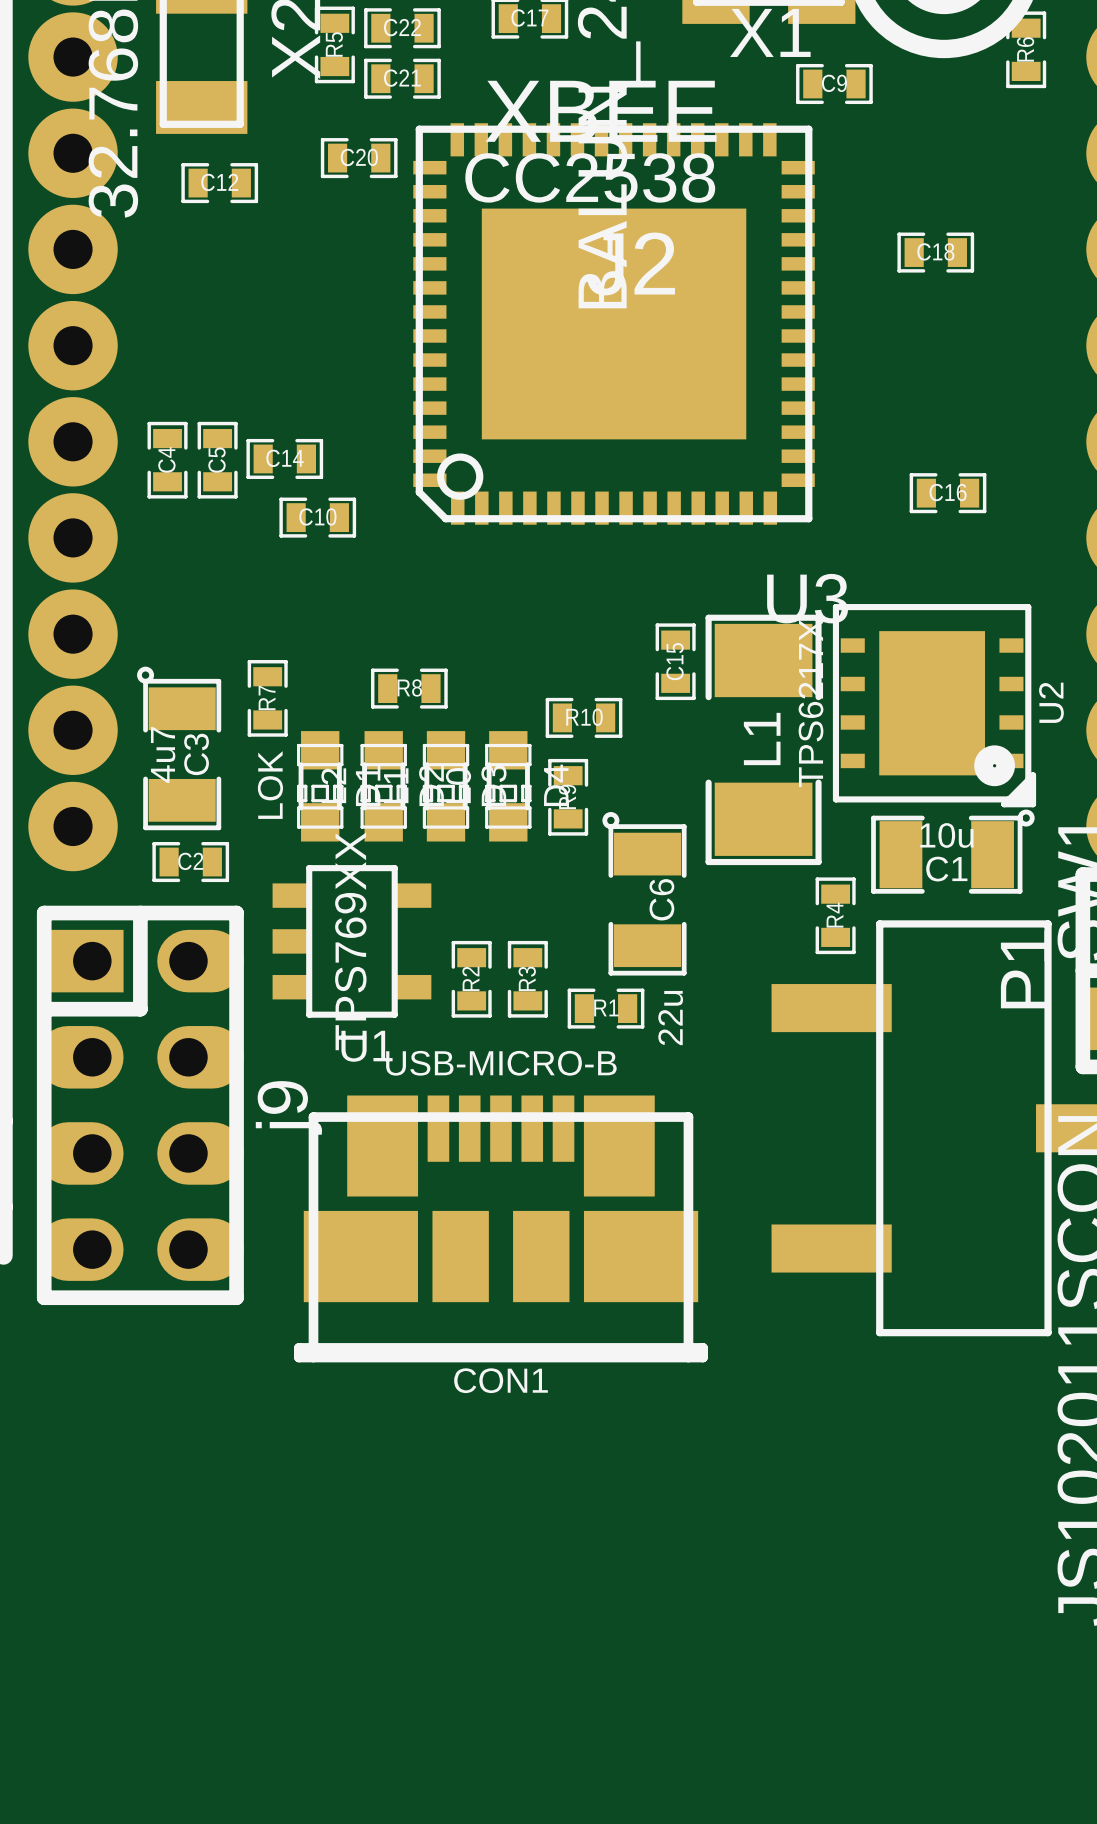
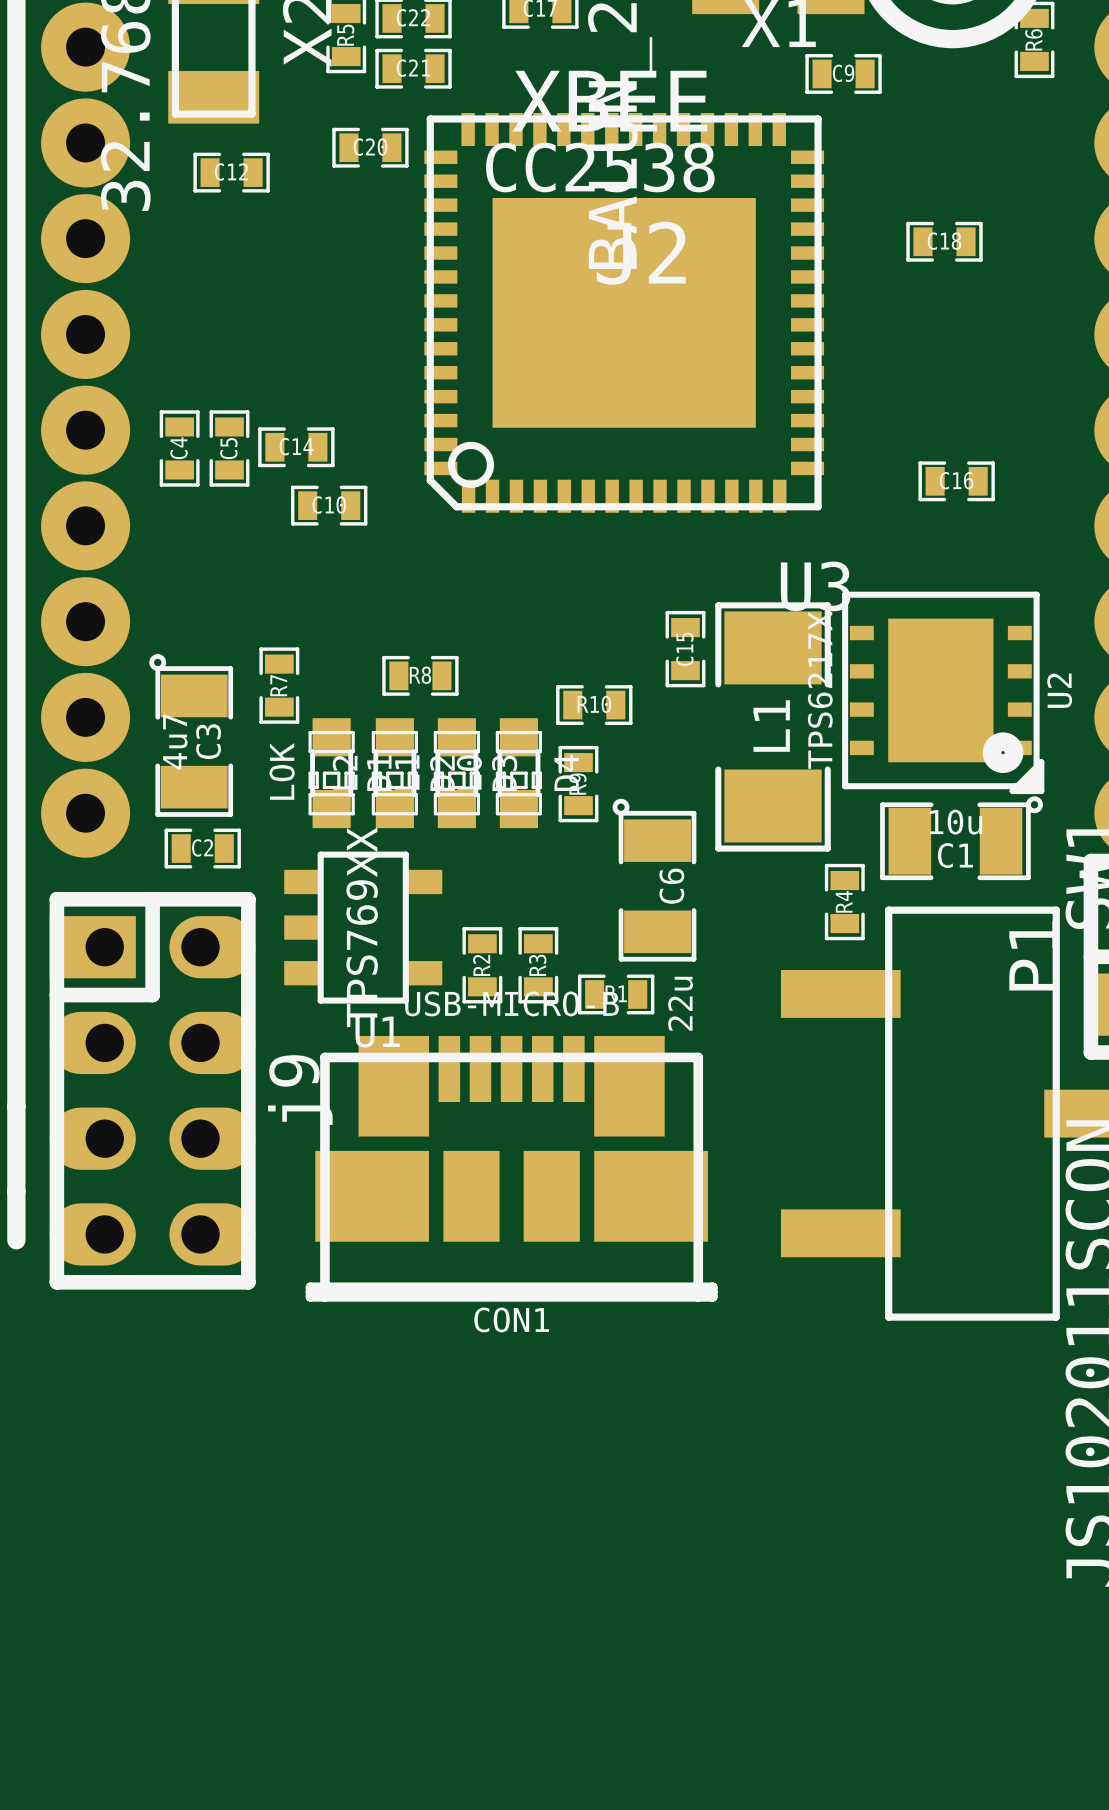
CON1 position: (500, 1228) -> (511, 1168)

